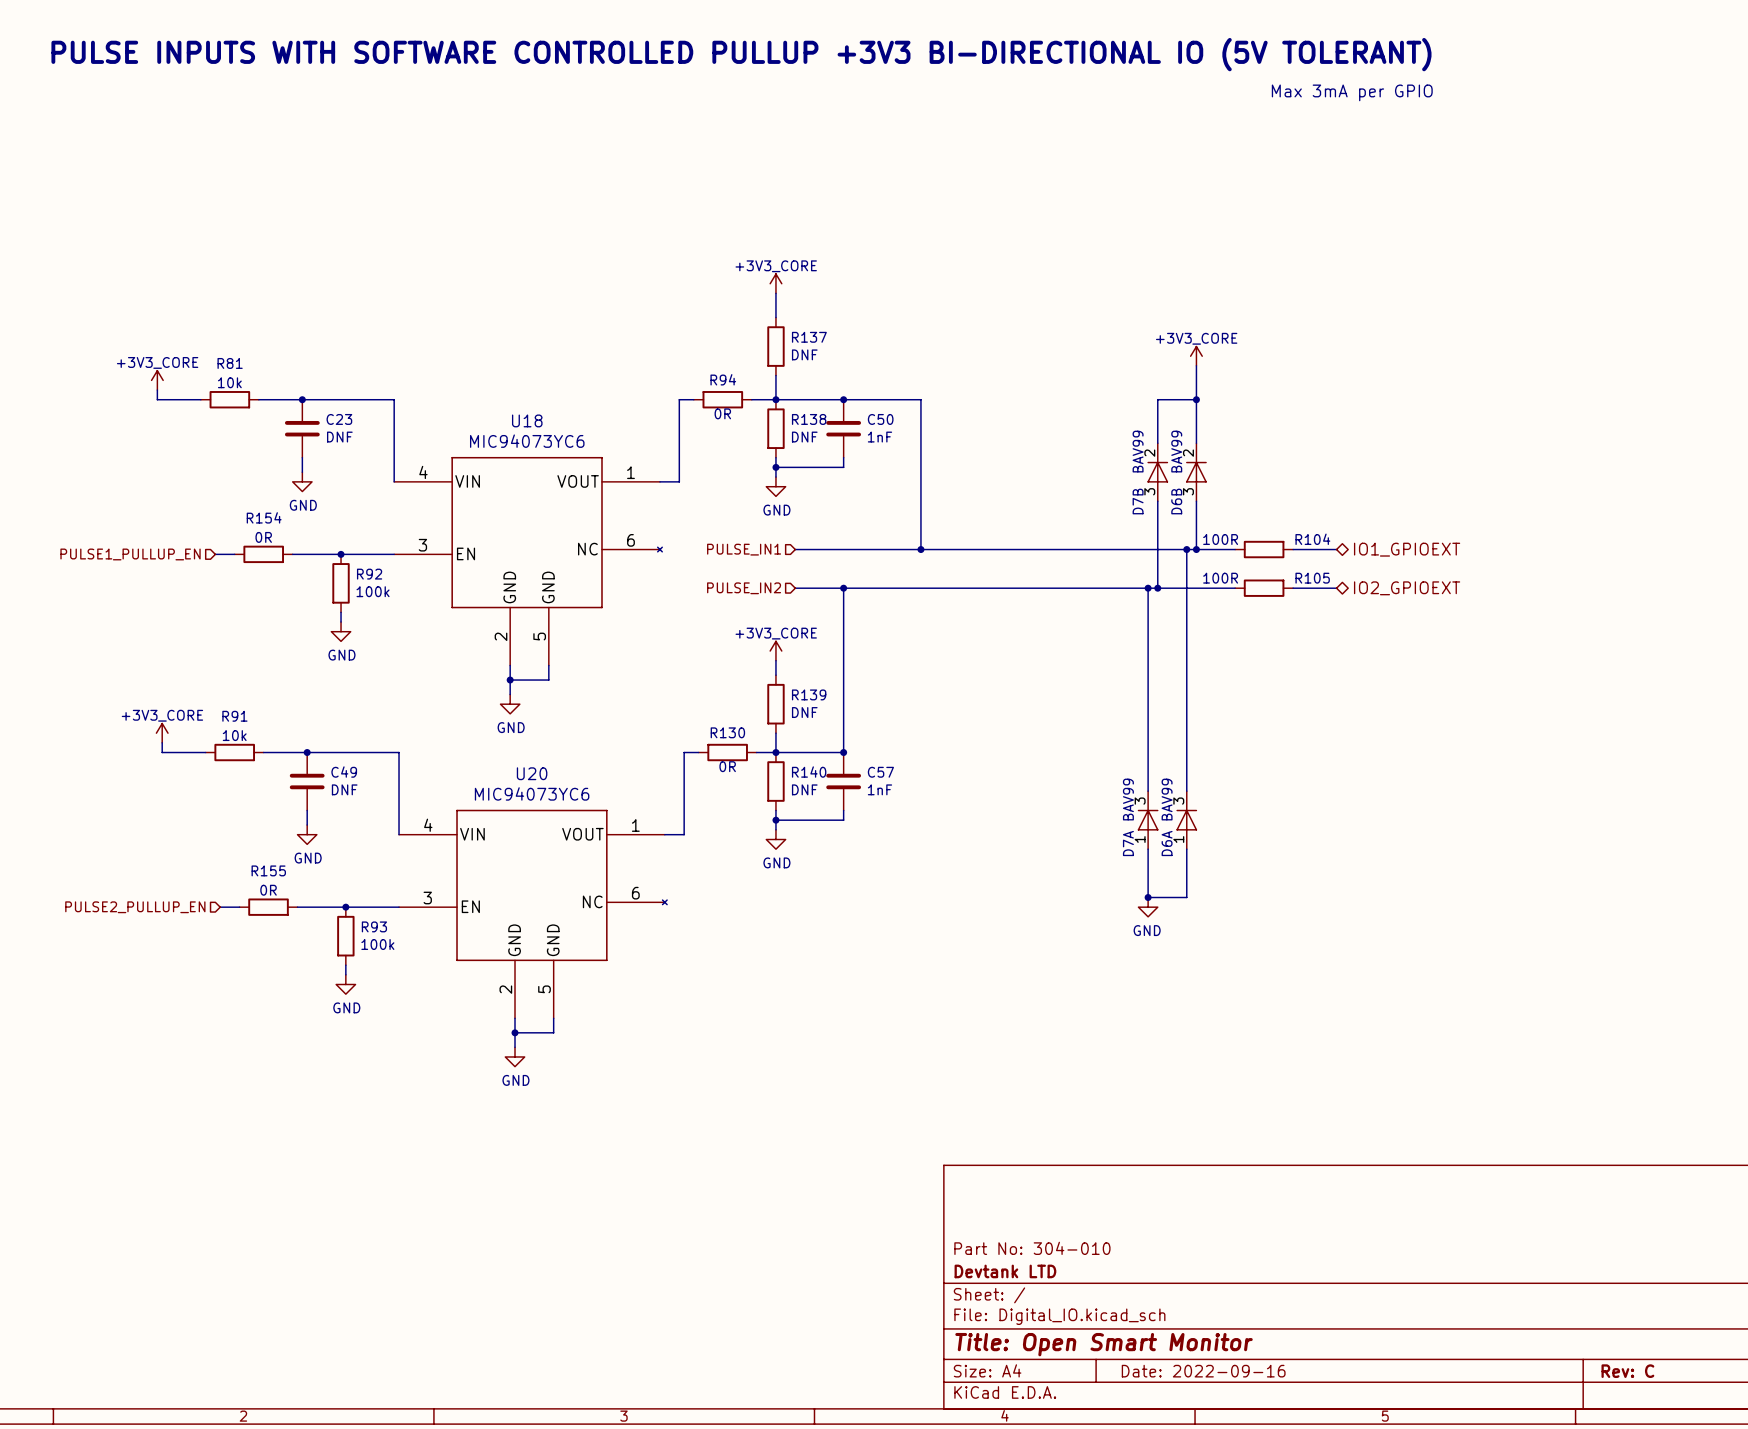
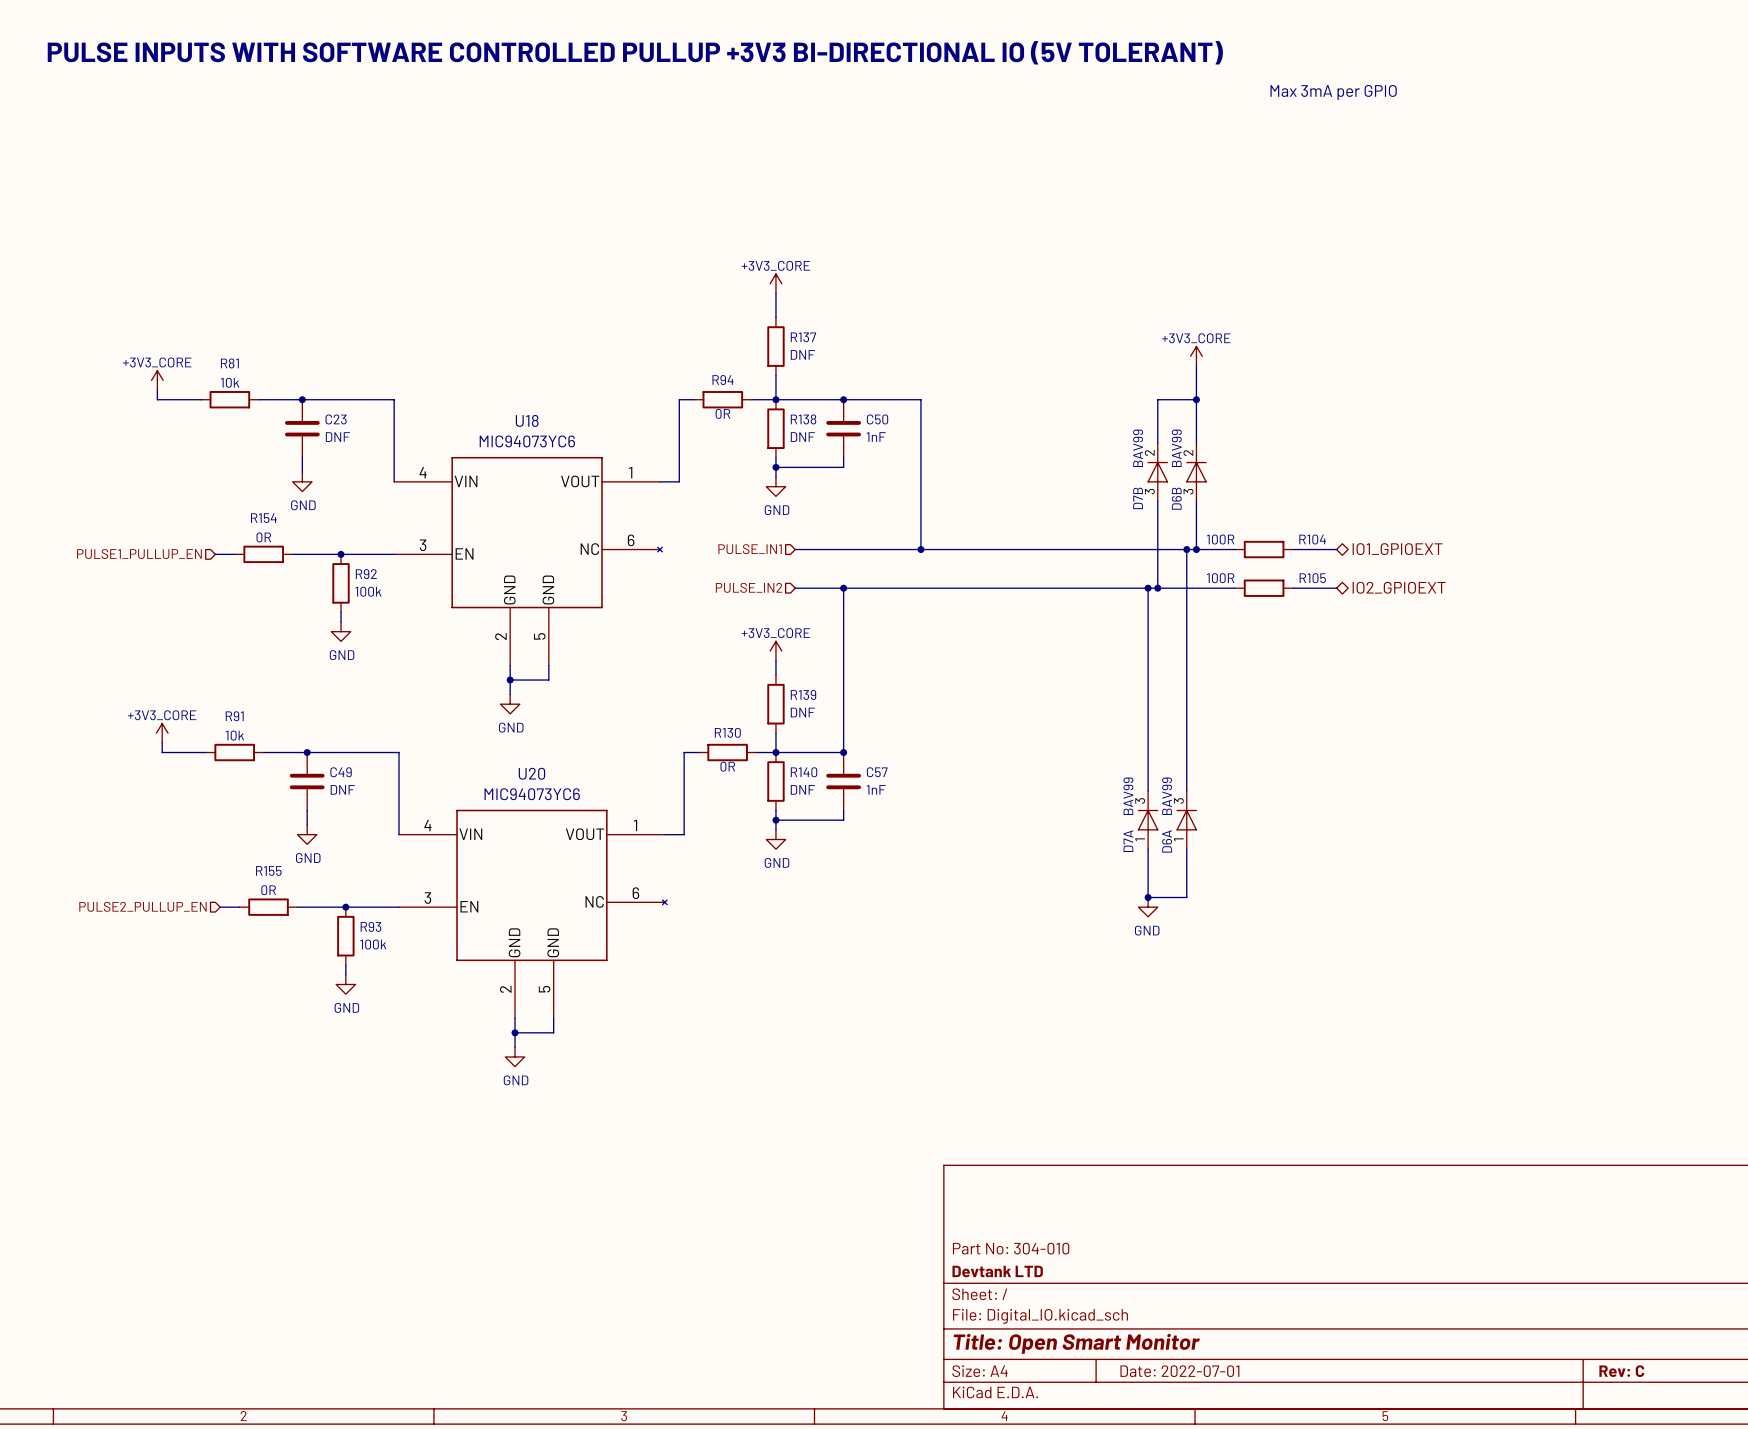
title block: Date: 2022-09-16 (1203, 1371) -> Date: 2022-07-01 (1179, 1371)

